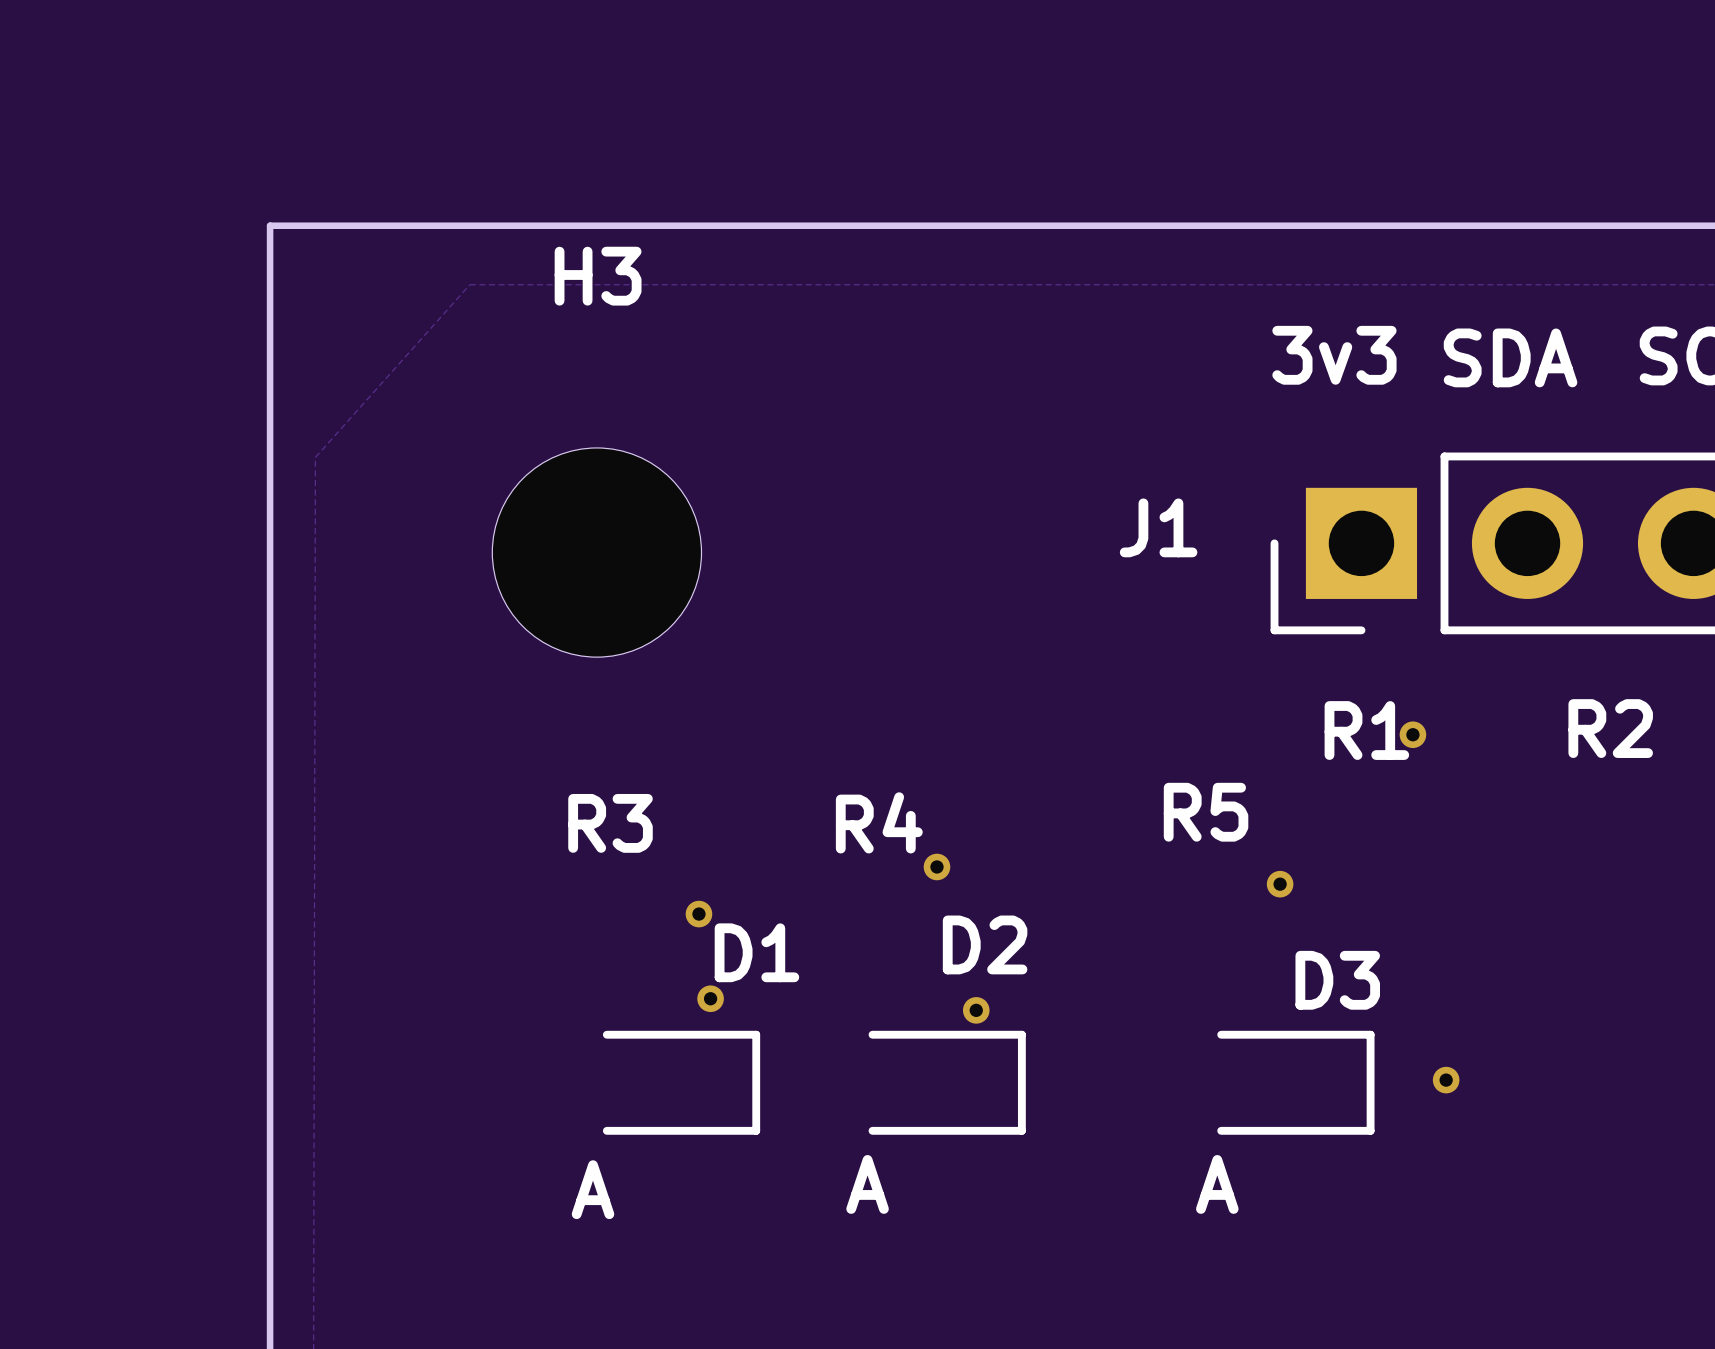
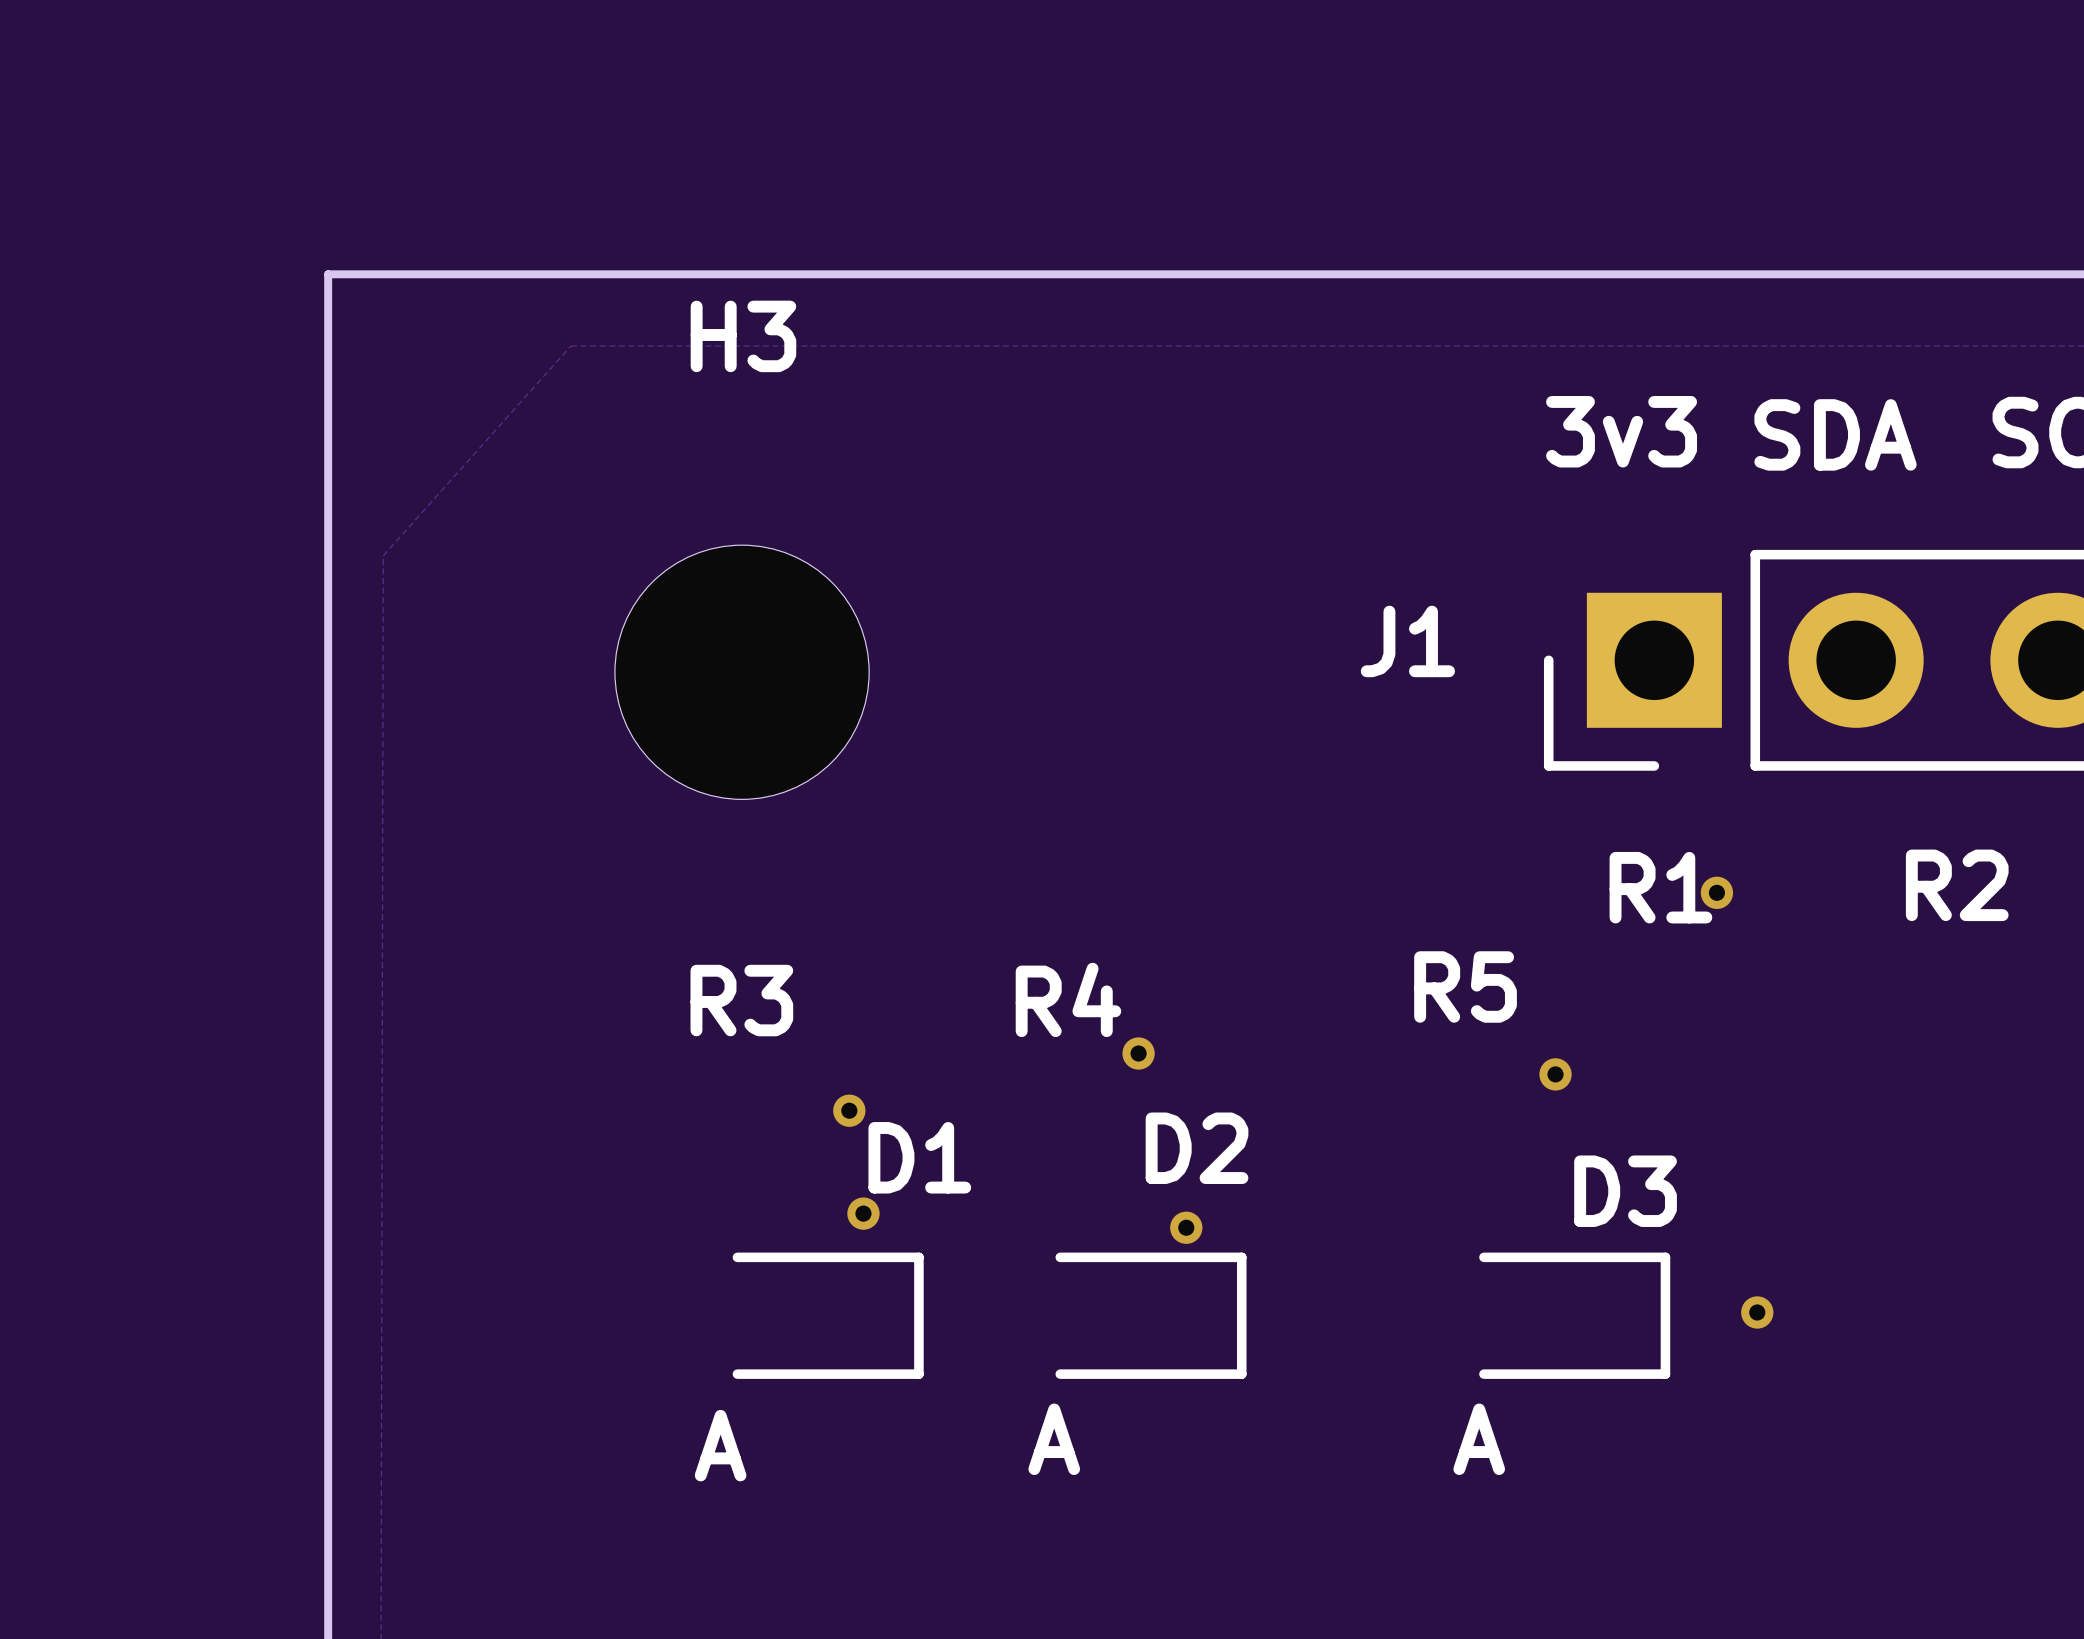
H3 position: (596, 552) -> (742, 672)

